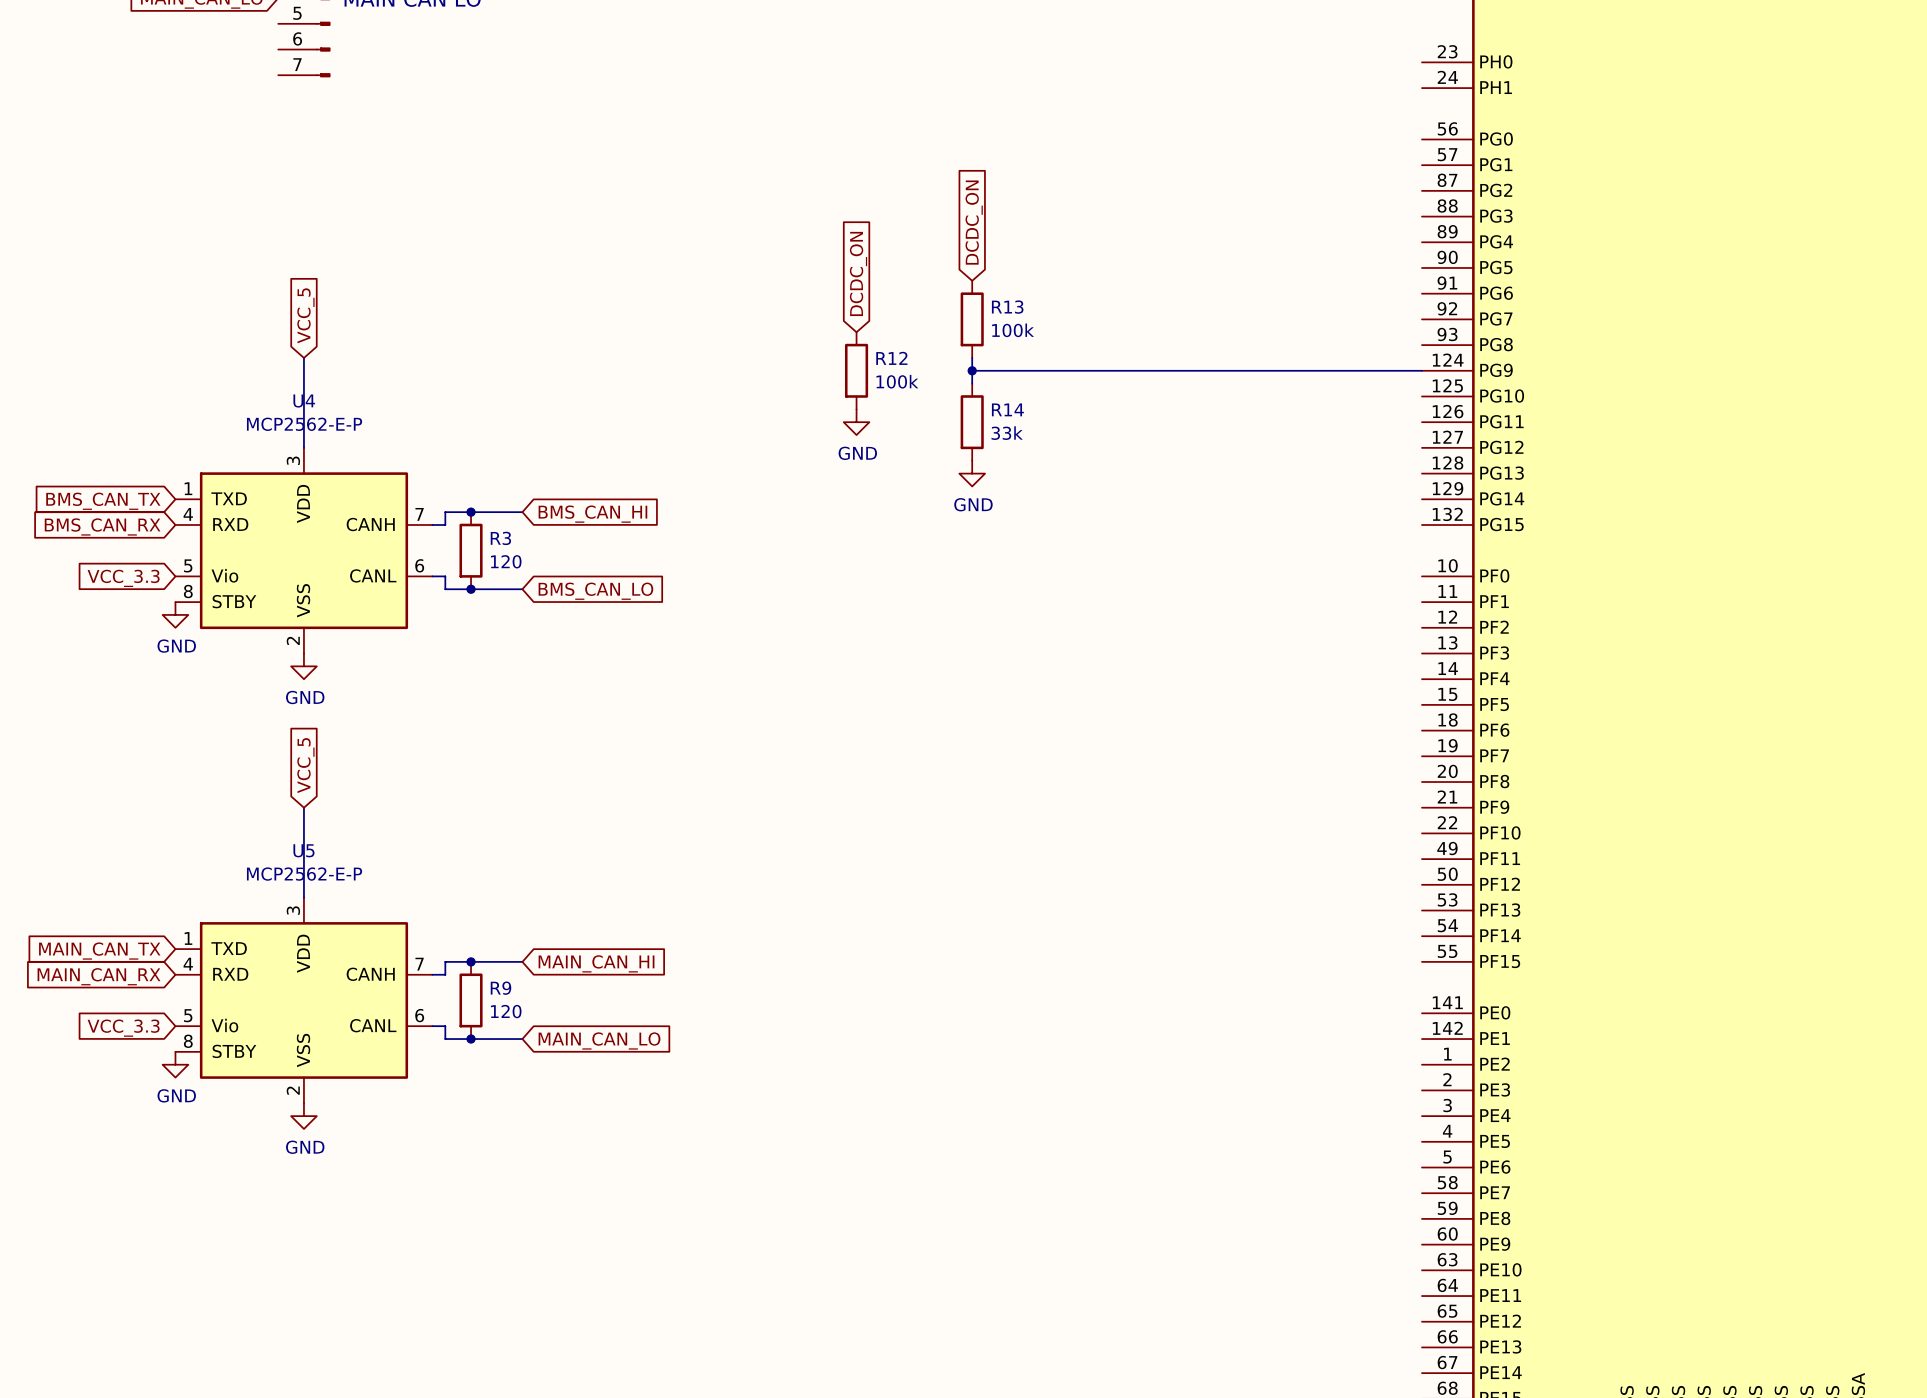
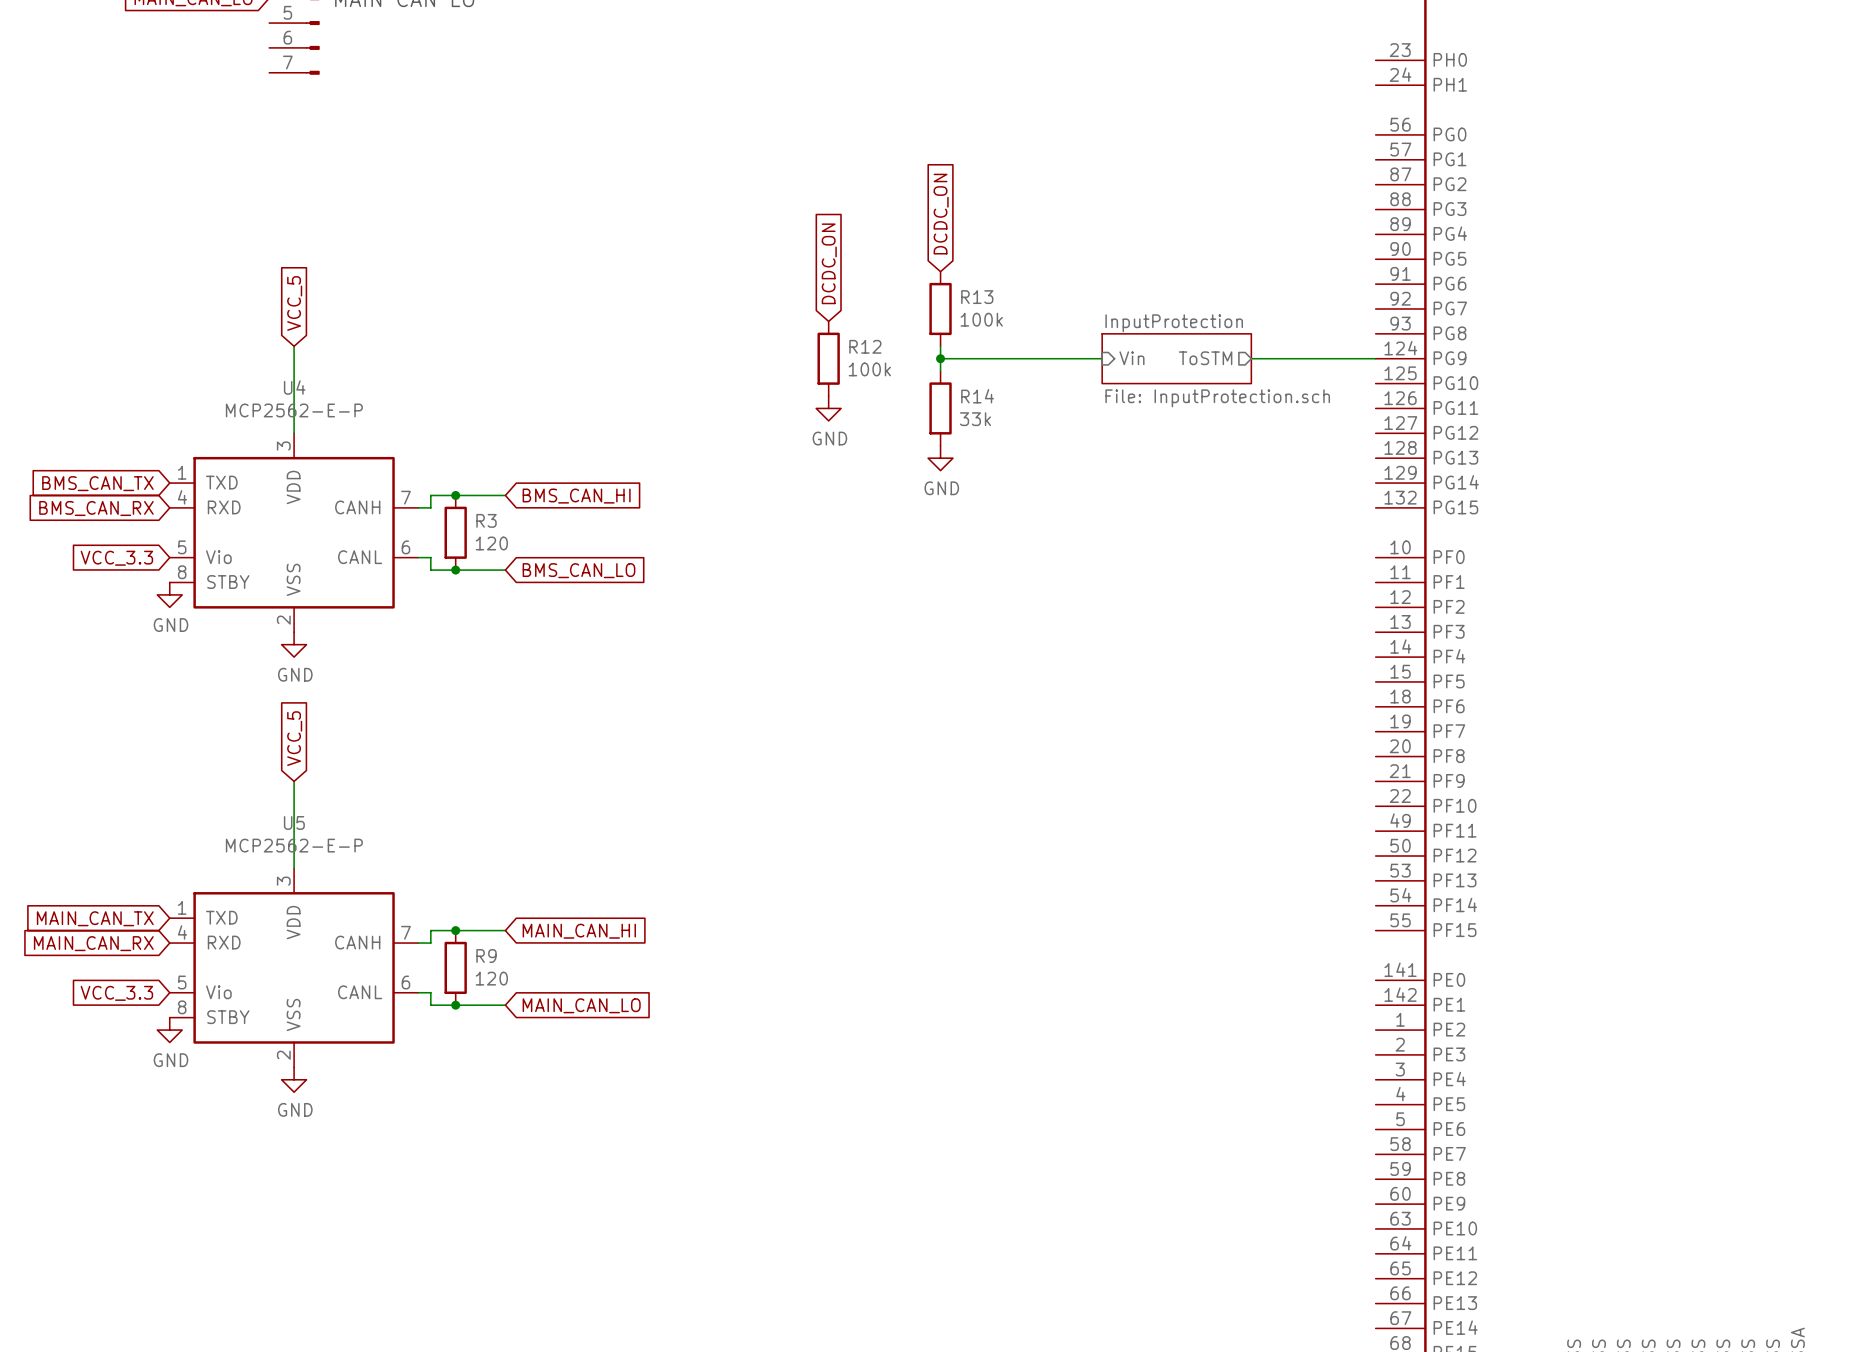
wire: (1139, 370) (1293, 370) -> none
sheet pin: none -> Vin (1131, 358)
sheet InputProtection: none -> File: InputProtection.sch (1176, 358)
sheet pin: none -> ToSTM (1205, 358)

